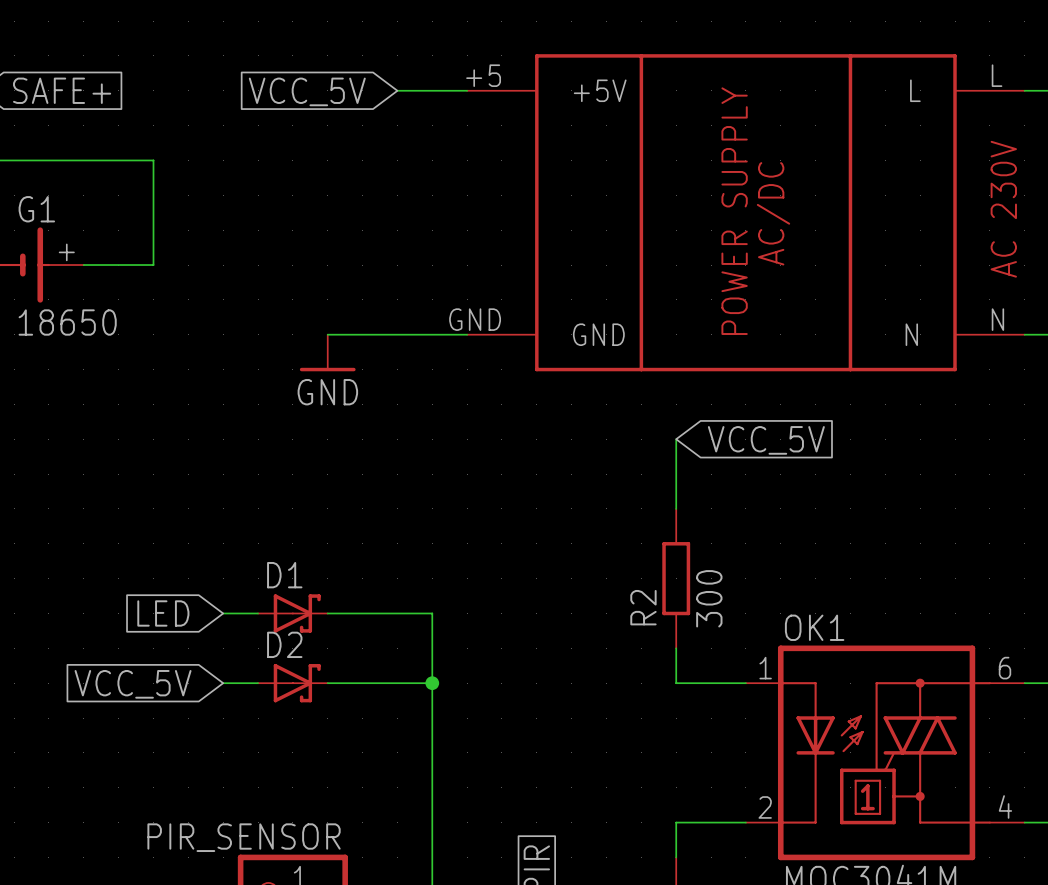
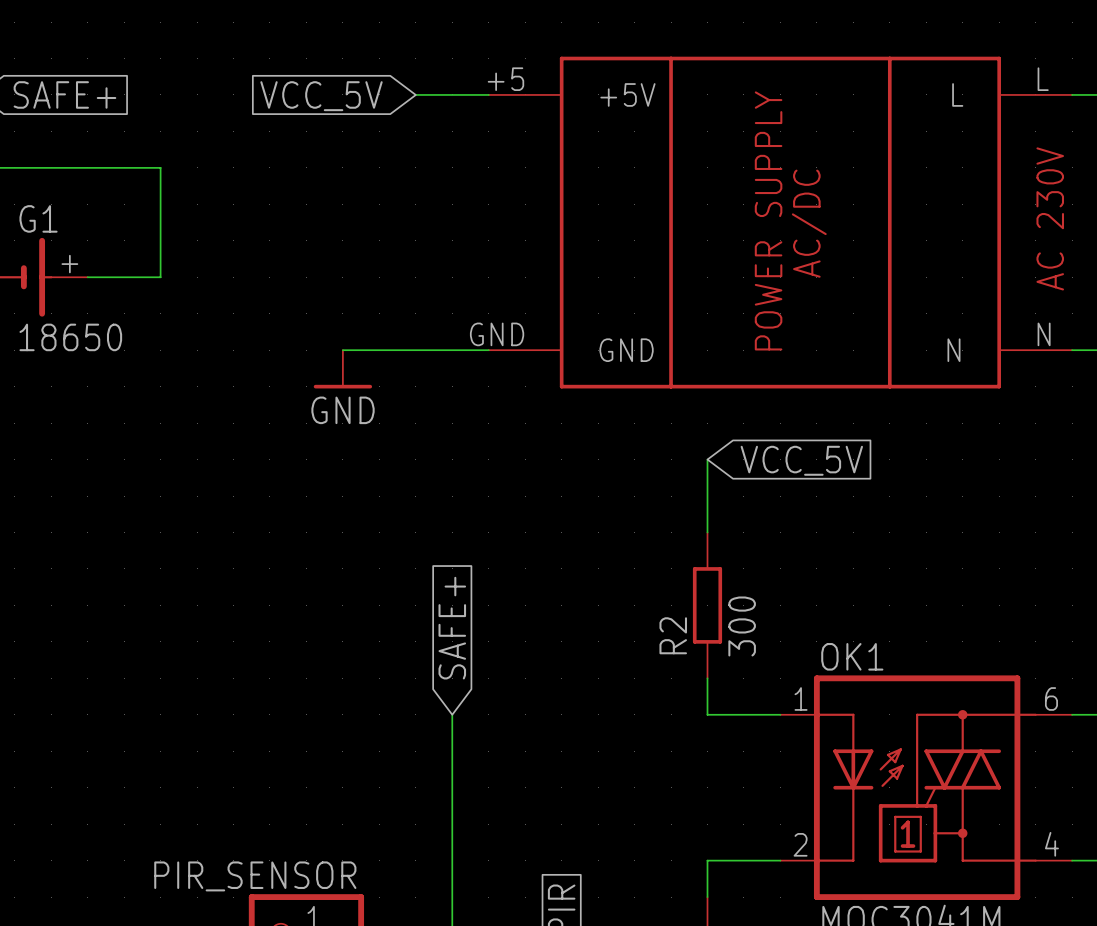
global label: none -> SAFE+ (452, 628)
global label: LED (163, 613) -> none
wire: (223, 613) (258, 613) -> none
D1: (292, 613) -> none
wire: (327, 613) (432, 613) (432, 683) (327, 683) -> none
wire: (223, 683) (258, 683) -> none
D2: (292, 683) -> none
junction: (432, 683) -> none
global label: VCC_5V (133, 684) -> none

